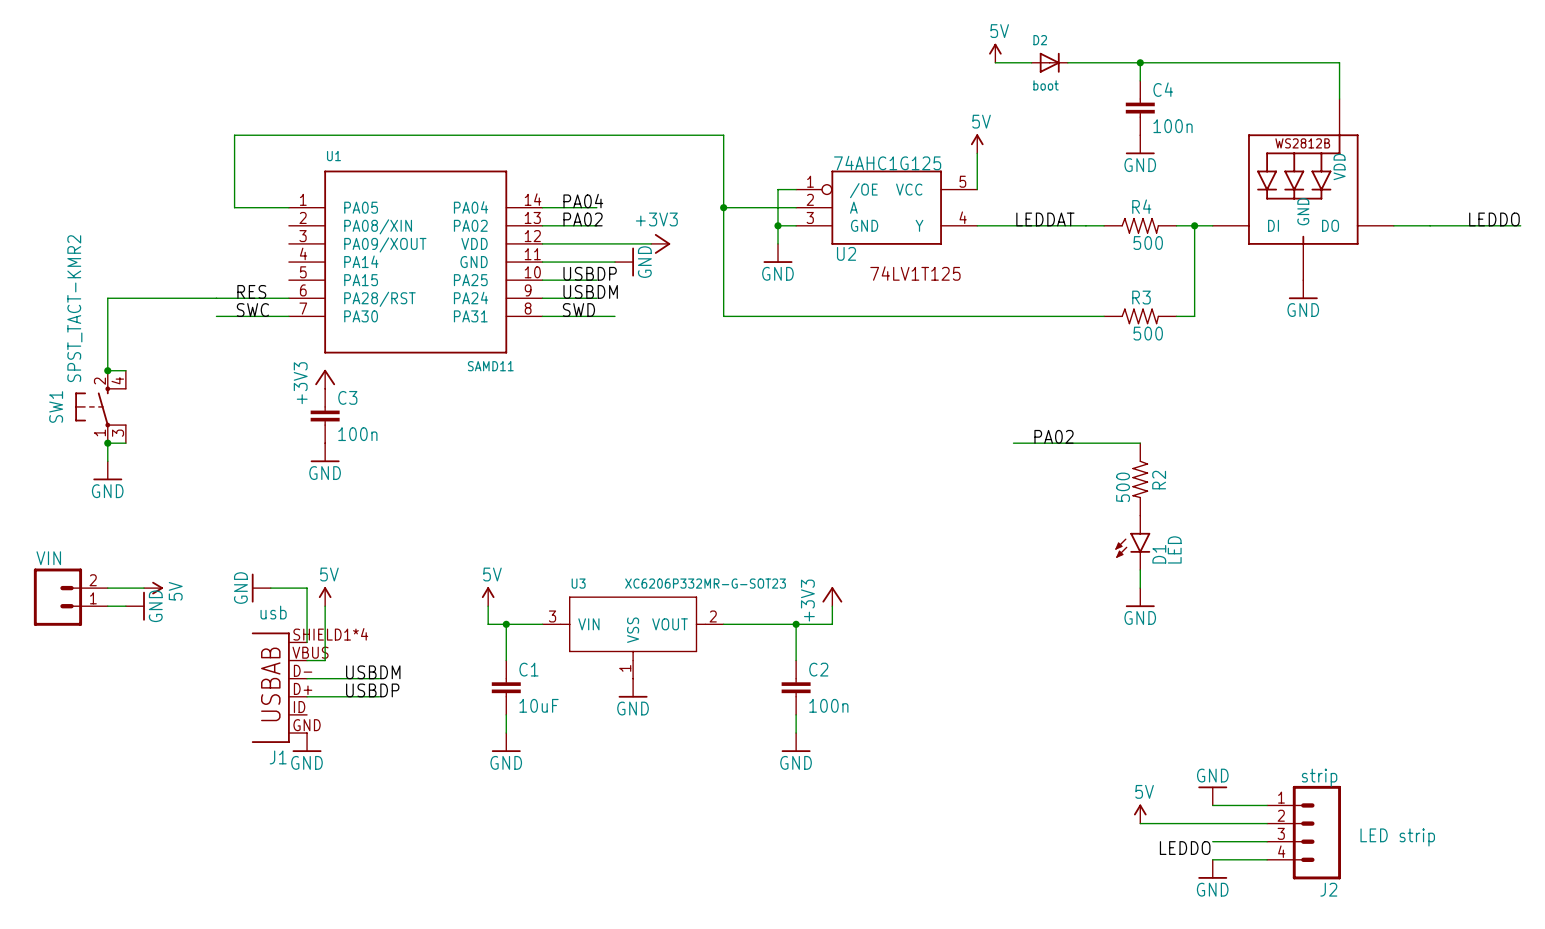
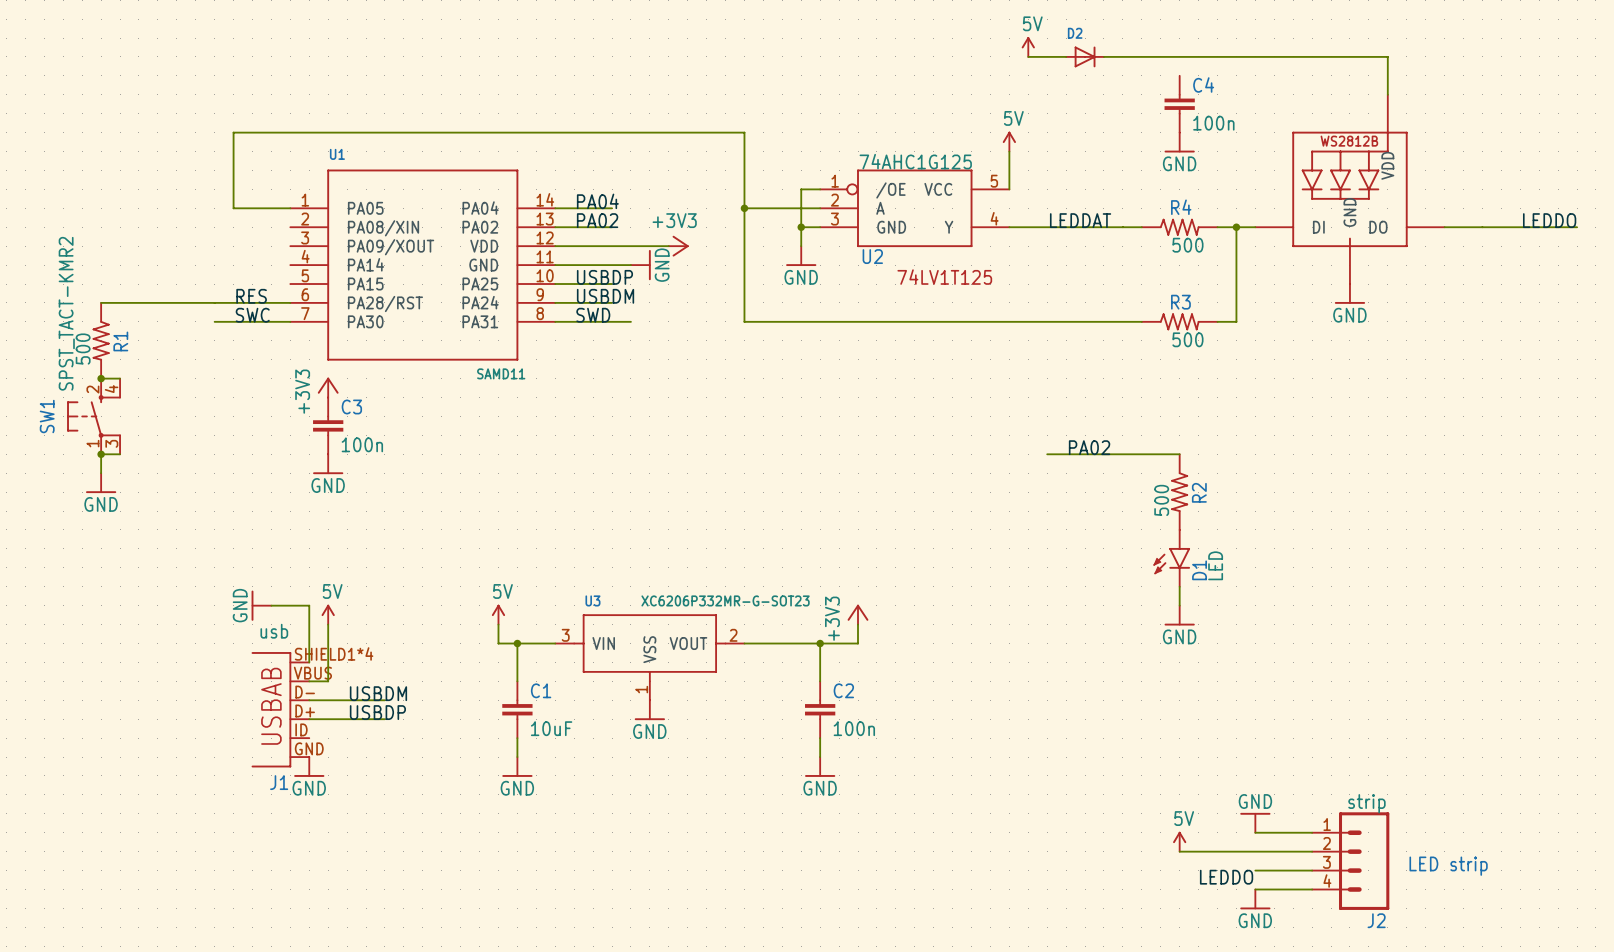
wire: (1140, 62) (1140, 80) -> none
junction: (1140, 62) -> none
D2 value: boot (1046, 85) -> none
R1: none -> 500 (101, 340)
wire: (107, 588) (144, 588) -> none
power symbol: 5V (153, 588) -> none
VIN: (70, 597) -> none
wire: (107, 606) (125, 606) -> none
power symbol: GND (135, 606) -> none

